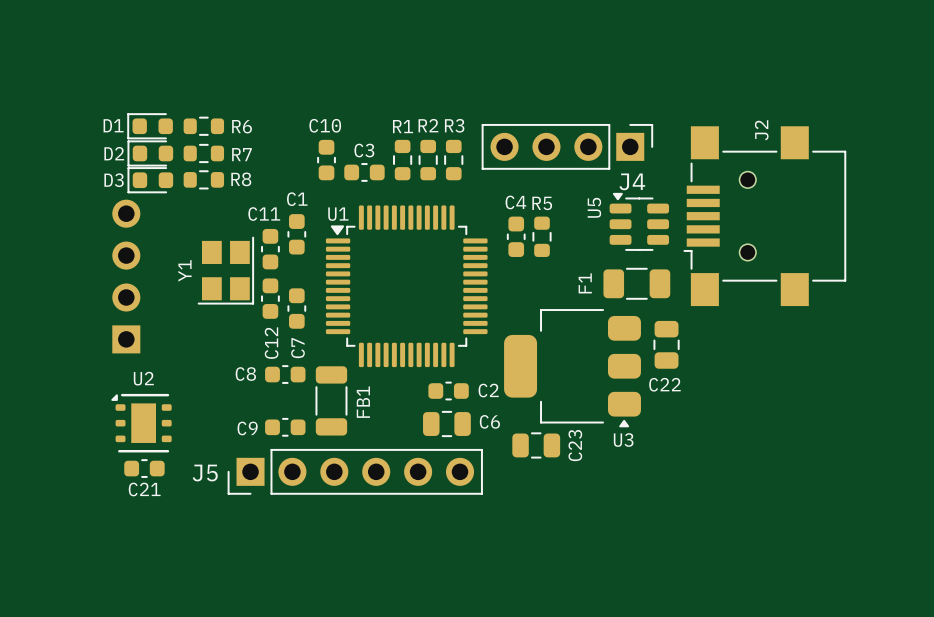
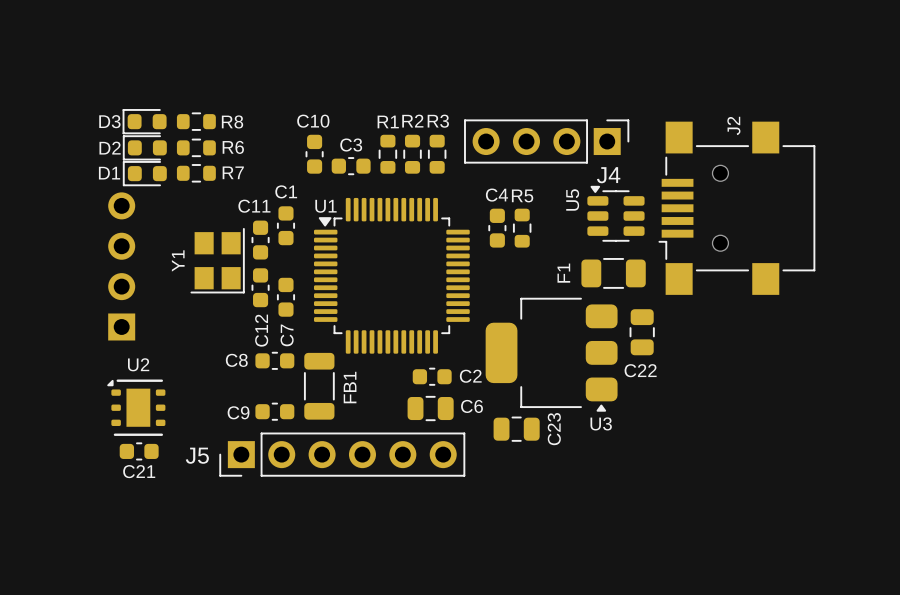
D1 name: D1 (113, 125) -> D3 (109, 121)
R6 name: R6 (242, 126) -> R8 (232, 121)
R7 name: R7 (241, 154) -> R6 (233, 147)
R8 name: R8 (241, 179) -> R7 (233, 172)
D3 name: D3 (114, 180) -> D1 (109, 173)

